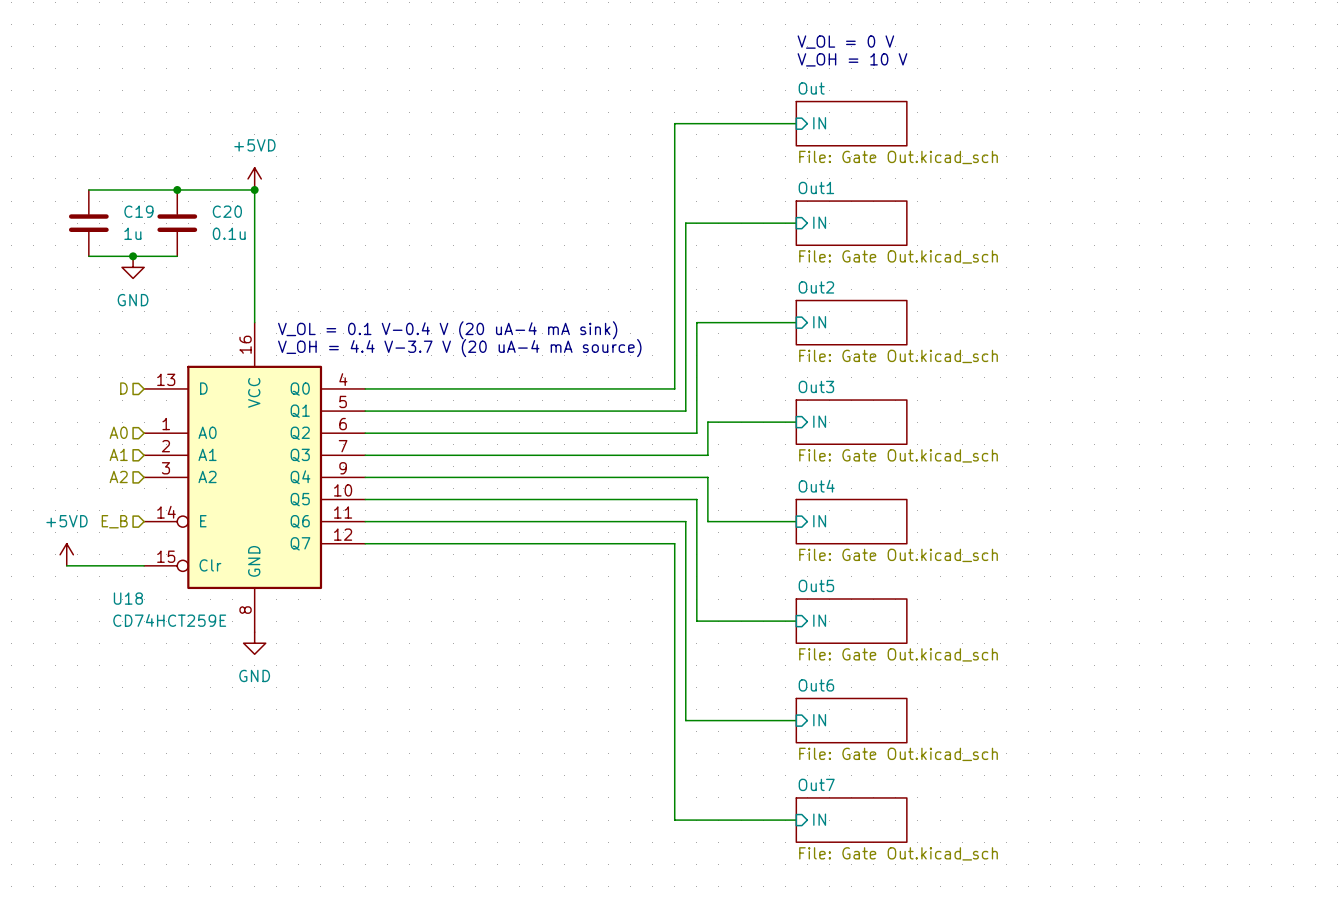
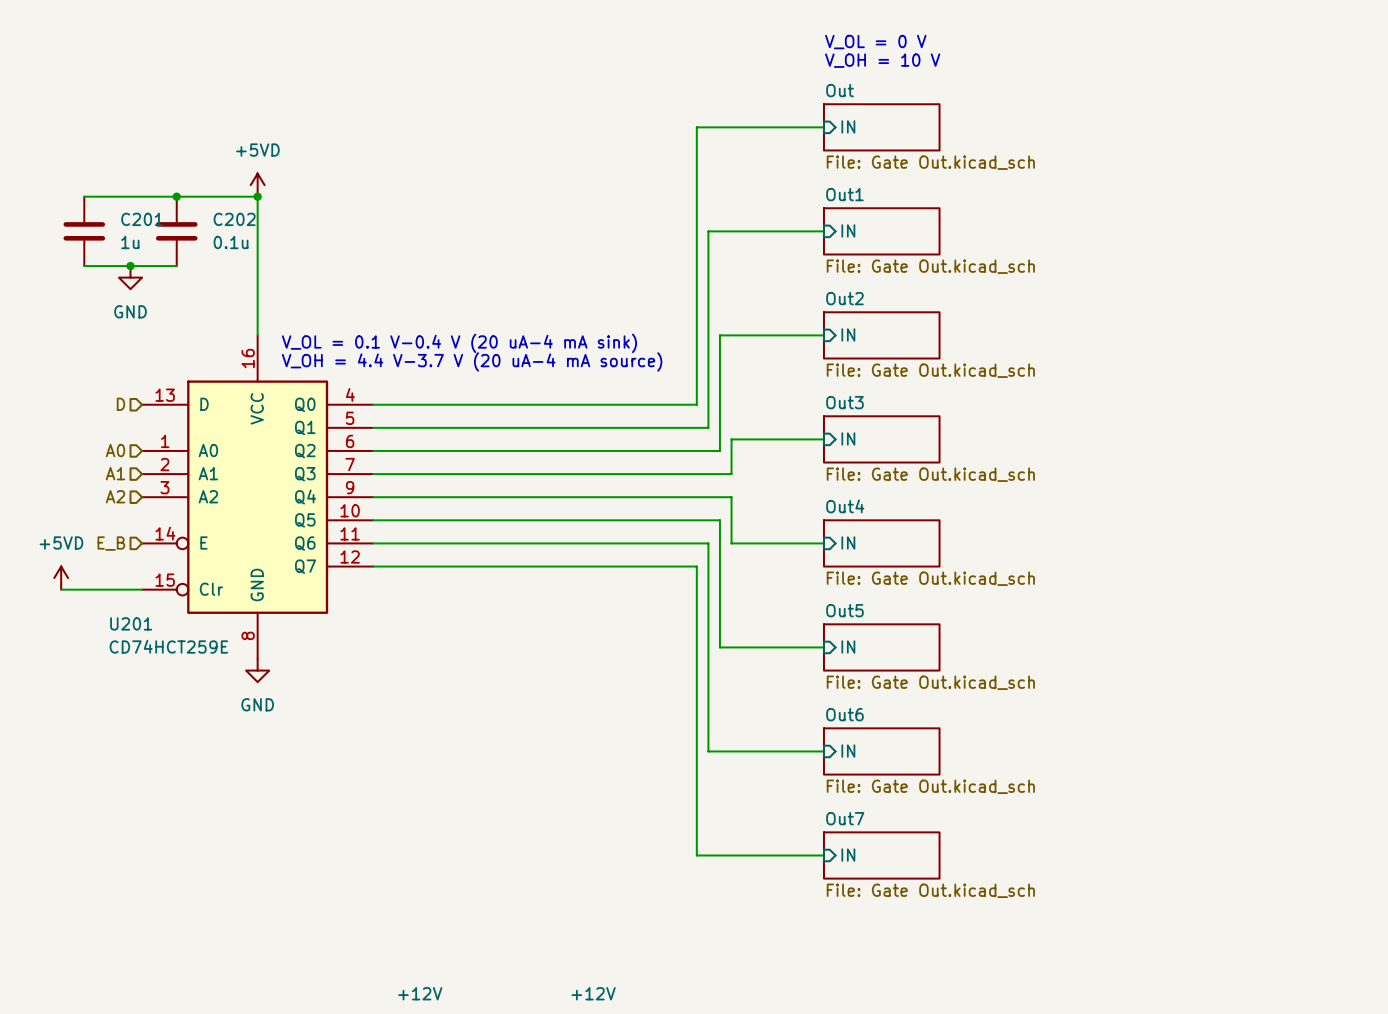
C19 name: C19 (138, 211) -> C201 (142, 219)
C20 name: C20 (227, 211) -> C202 (234, 219)
U18 name: U18 (128, 598) -> U201 (131, 623)

